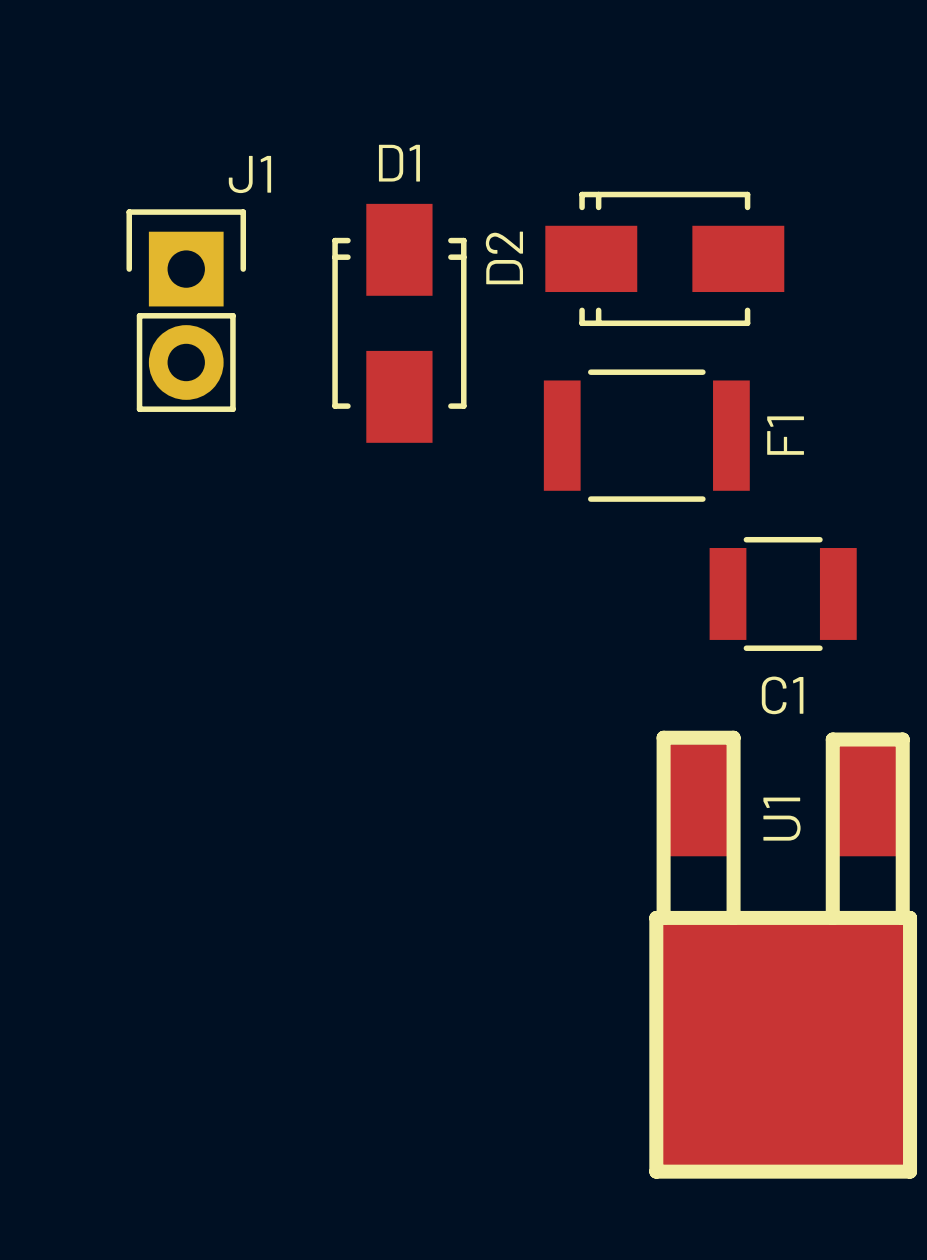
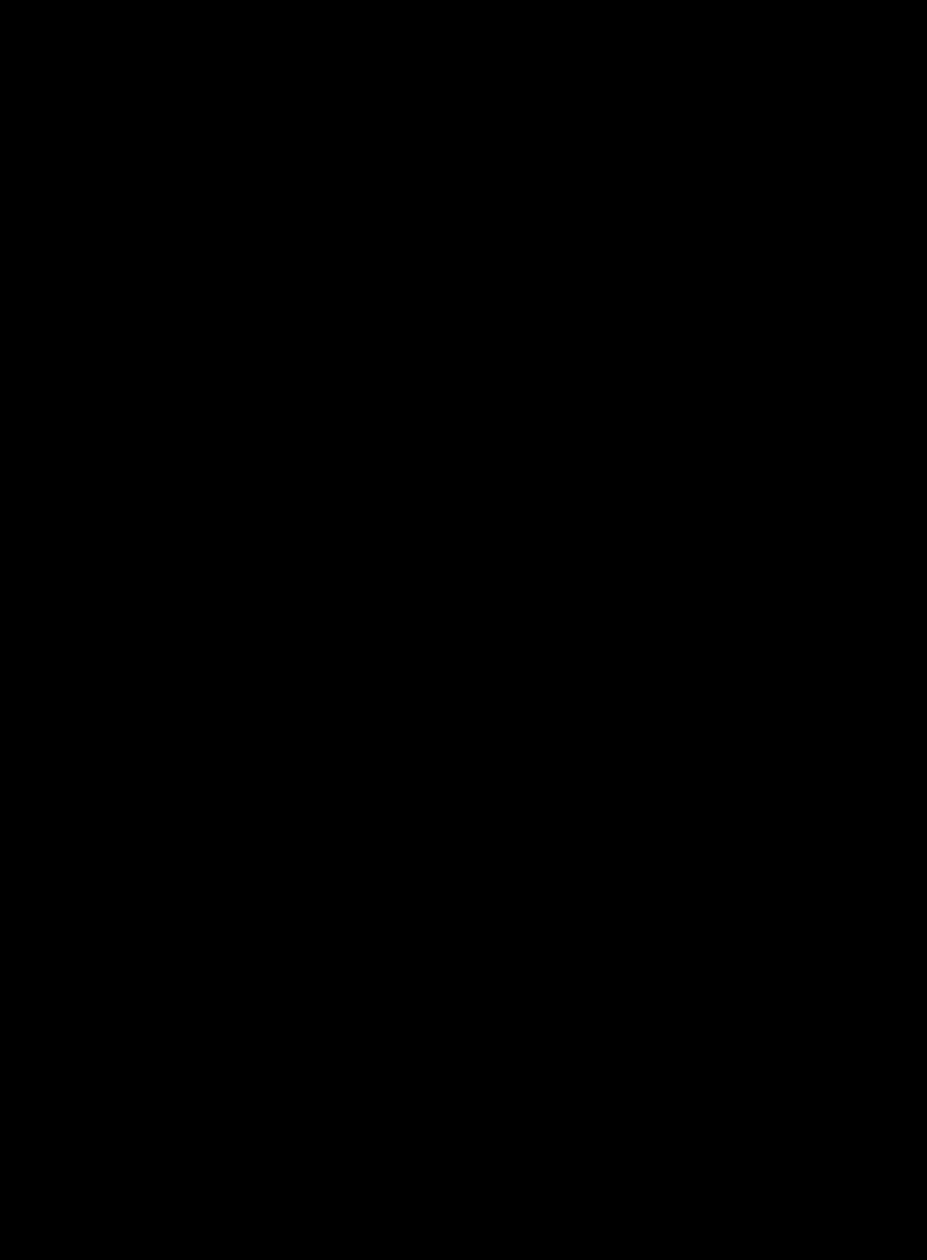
D2: (664, 258) -> none
J1: (186, 310) -> none
D1: (399, 323) -> none
F1: (646, 435) -> none
C1: (783, 593) -> none
U1: (783, 954) -> none

